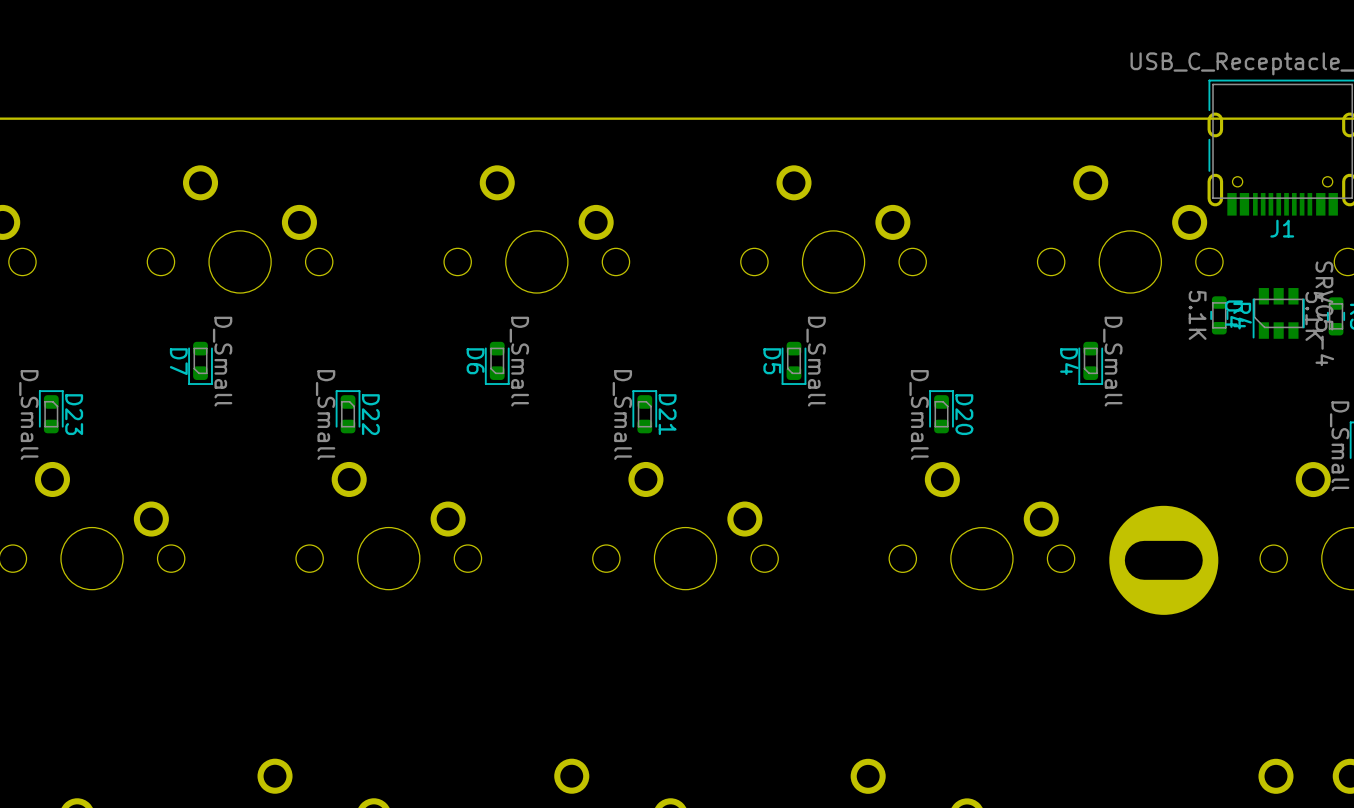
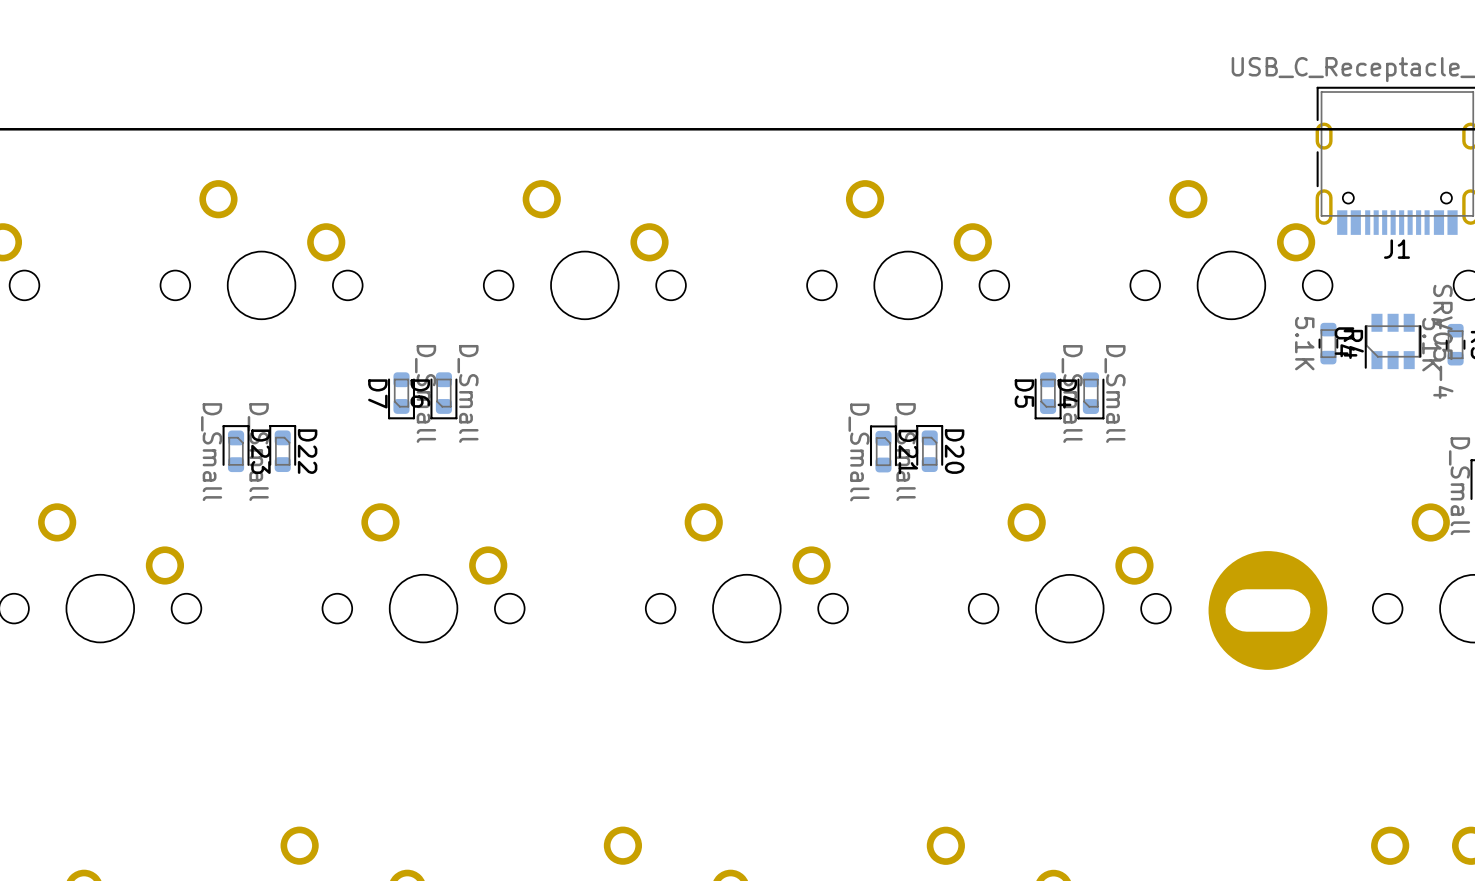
D7 position: (200, 363) -> (401, 395)
D6 position: (497, 363) -> (443, 395)
D5 position: (793, 363) -> (1048, 395)
D4 position: (1090, 363) -> (1090, 395)
D23 position: (51, 411) -> (236, 448)
D22 position: (348, 411) -> (282, 448)
D21 position: (644, 411) -> (883, 448)
D20 position: (941, 411) -> (929, 448)

